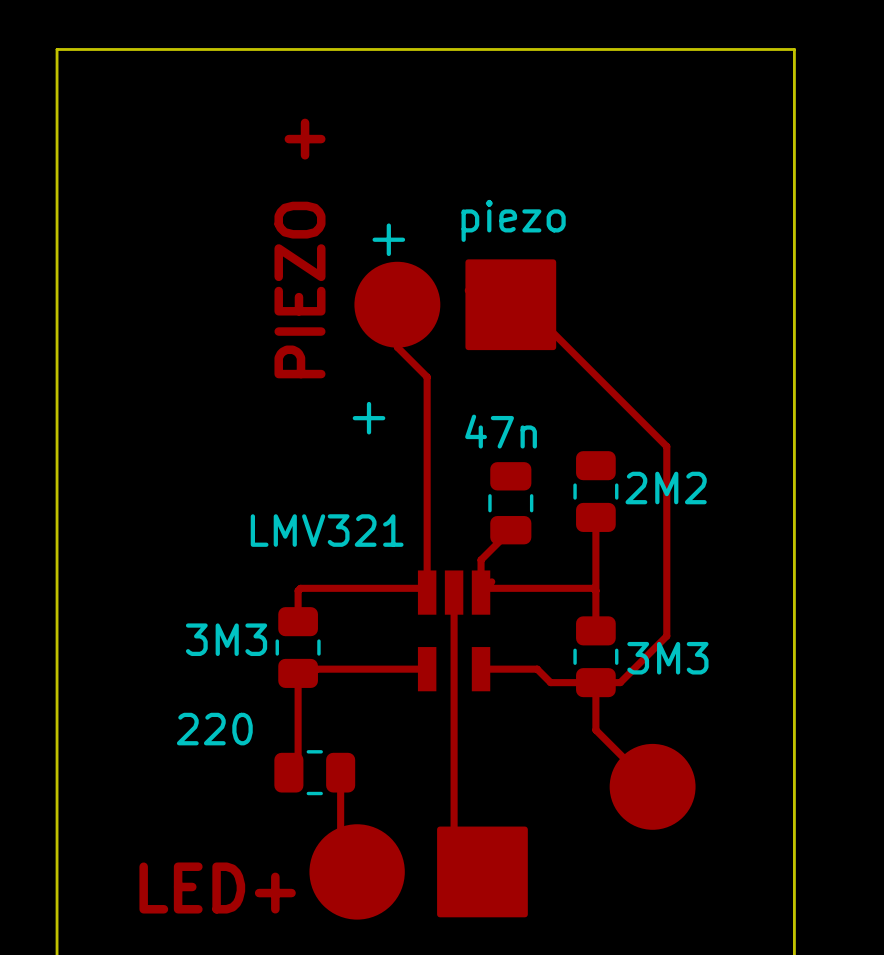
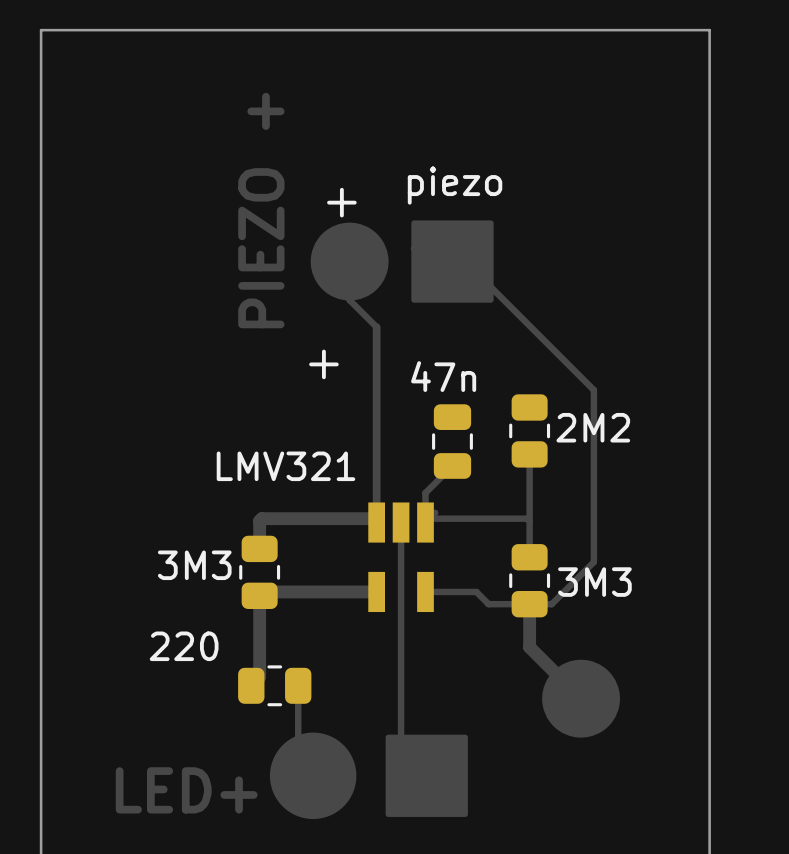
track width: thin (427, 377) (427, 592) (422, 588) (300, 588) (298, 590) (298, 621) -> thick (376, 327) (376, 522) (372, 518) (261, 518) (259, 520) (259, 548)
track width: thin (316, 669) (427, 669) -> thick (276, 591) (376, 591)
track width: thin (298, 673) (298, 763) -> thick (259, 595) (259, 677)
track width: thin (595, 682) (595, 730) (652, 786) -> thick (529, 604) (529, 647) (581, 698)

